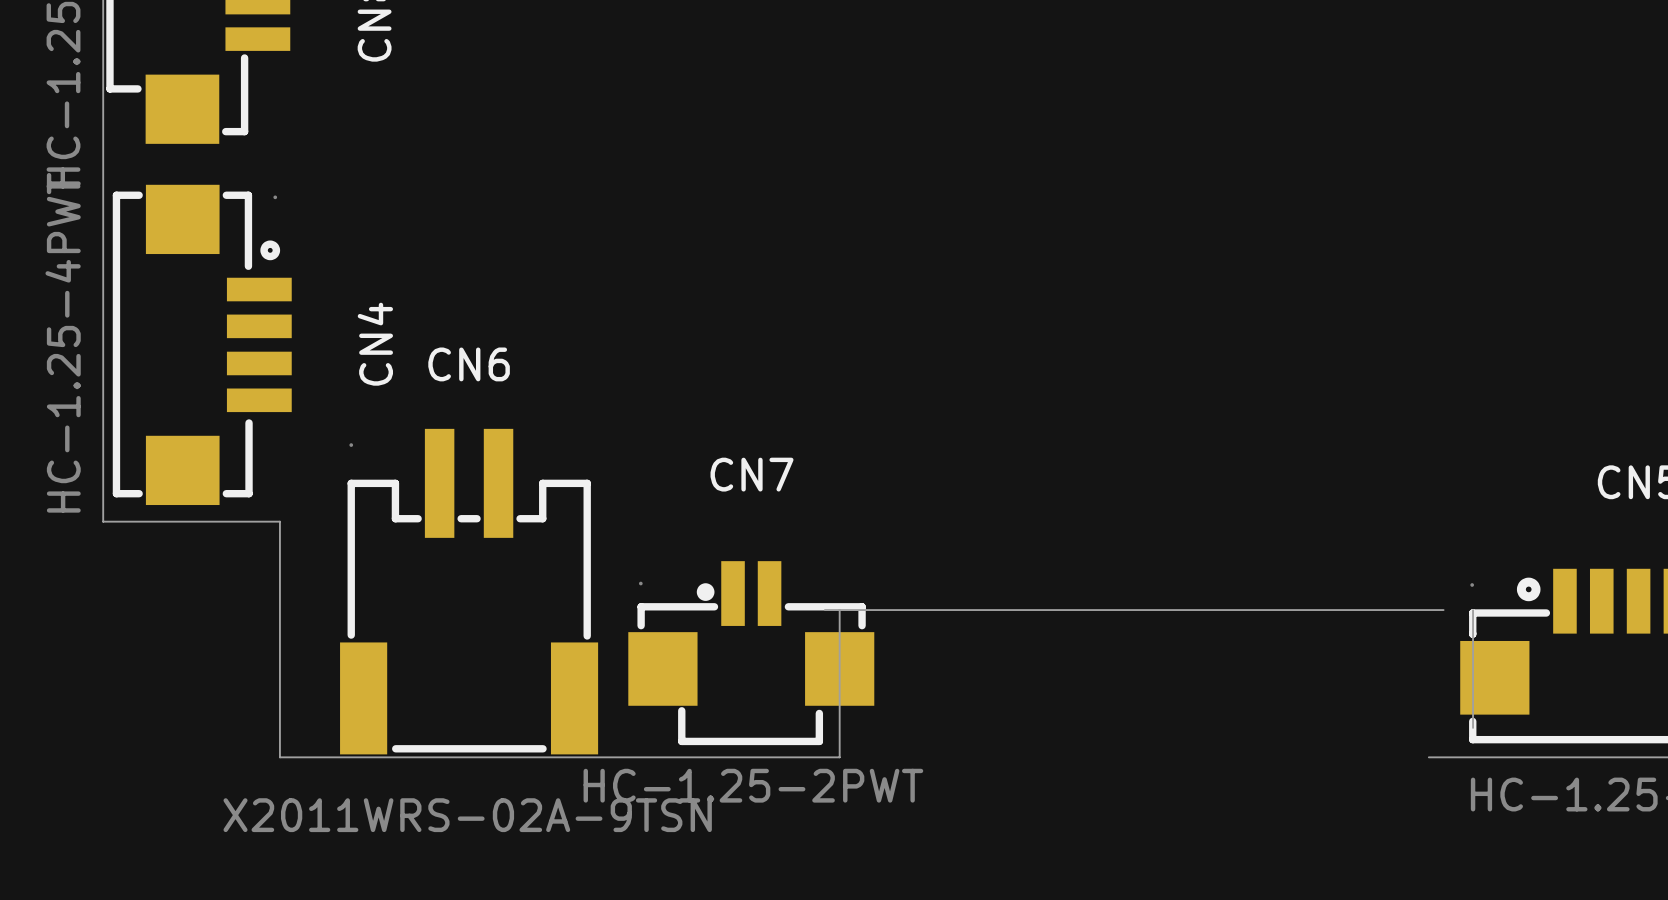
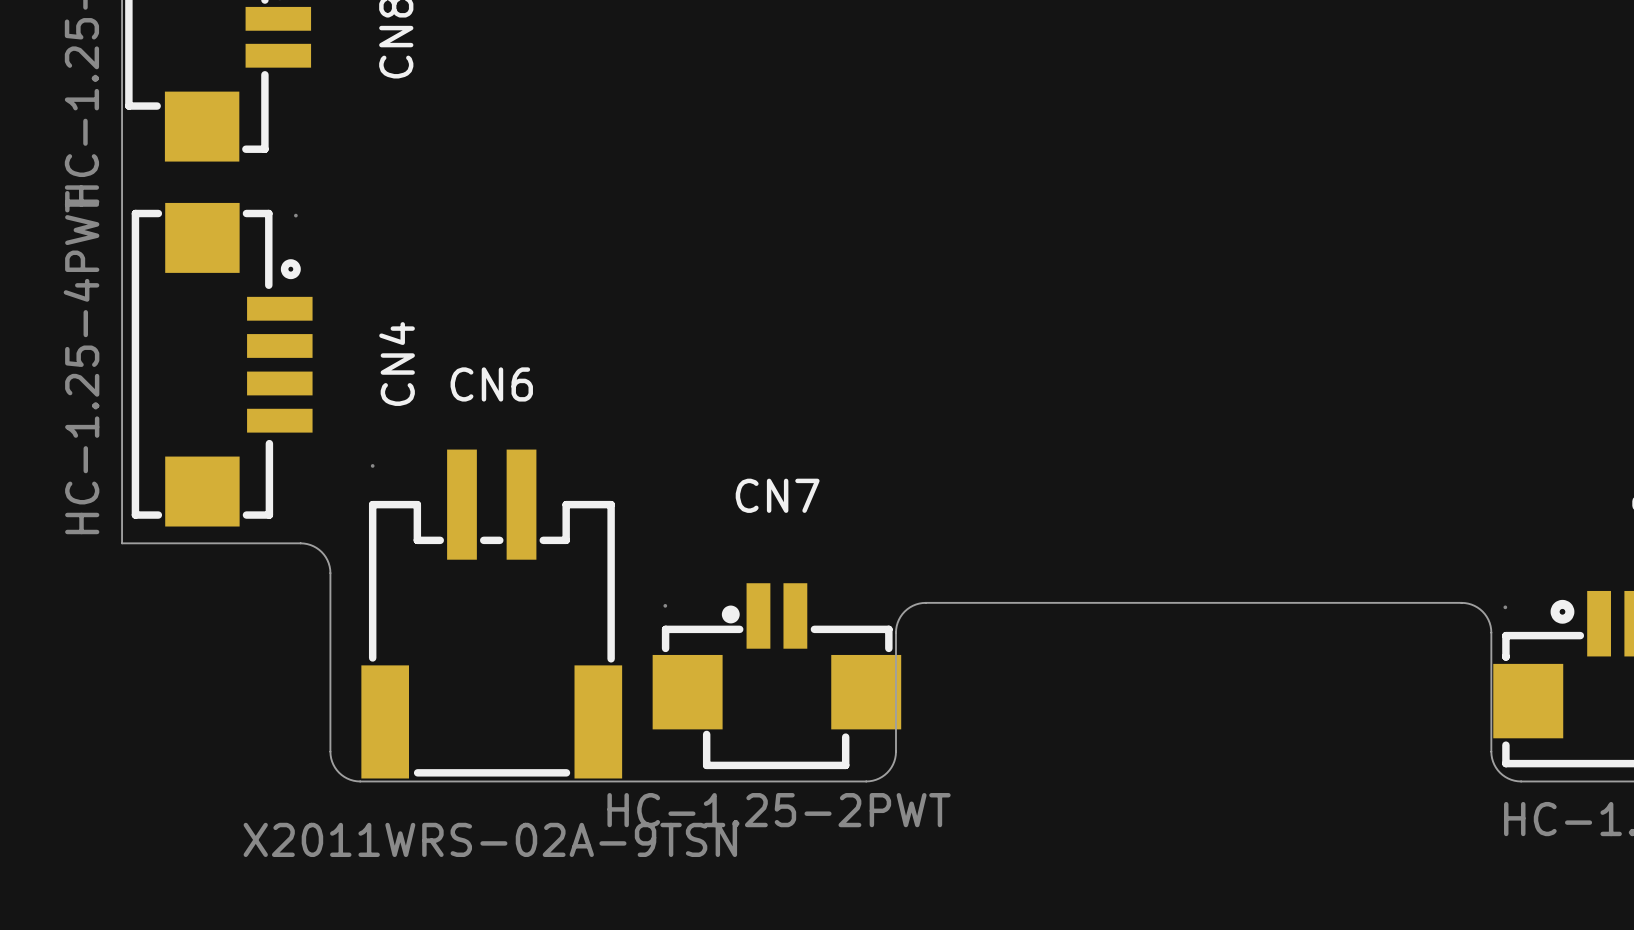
board edge: (279, 521) (279, 757) (338, 757) -> (300, 543) (310, 545) (319, 549) (325, 557) (330, 569) (331, 758) (334, 767) (341, 774) (350, 779) (360, 781)
board edge: (824, 610) (1443, 610) -> none
board edge: (839, 610) (839, 757) -> none
board edge: (1473, 610) (1473, 727) -> none
board edge: (1428, 757) (1487, 757) -> (866, 781) (876, 779) (884, 774) (891, 767) (895, 758) (897, 622) (907, 609) (915, 604) (925, 602) (1461, 602) (1471, 604) (1484, 614) (1491, 629) (1492, 758) (1495, 767) (1502, 774) (1511, 779) (1521, 781)

